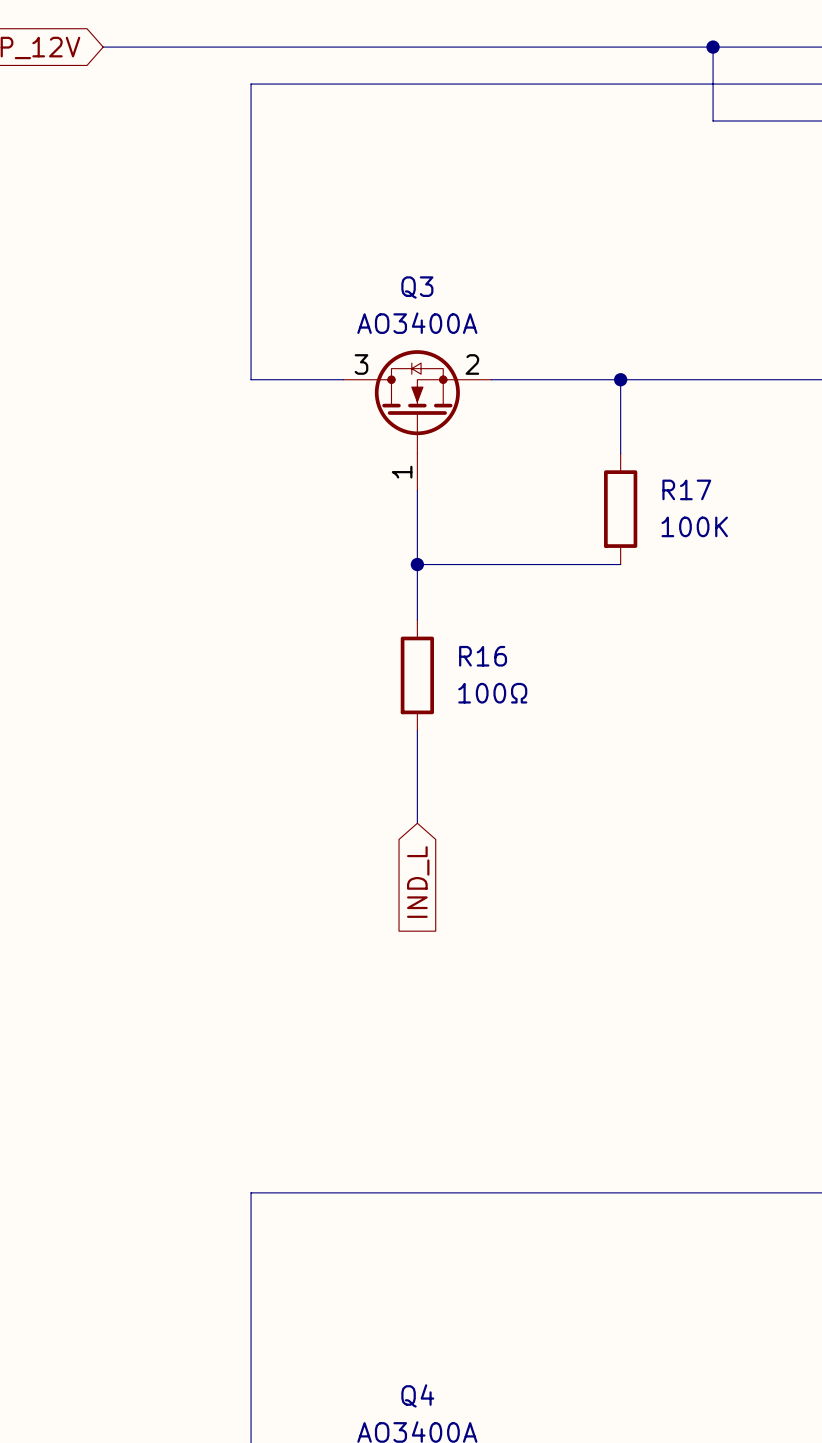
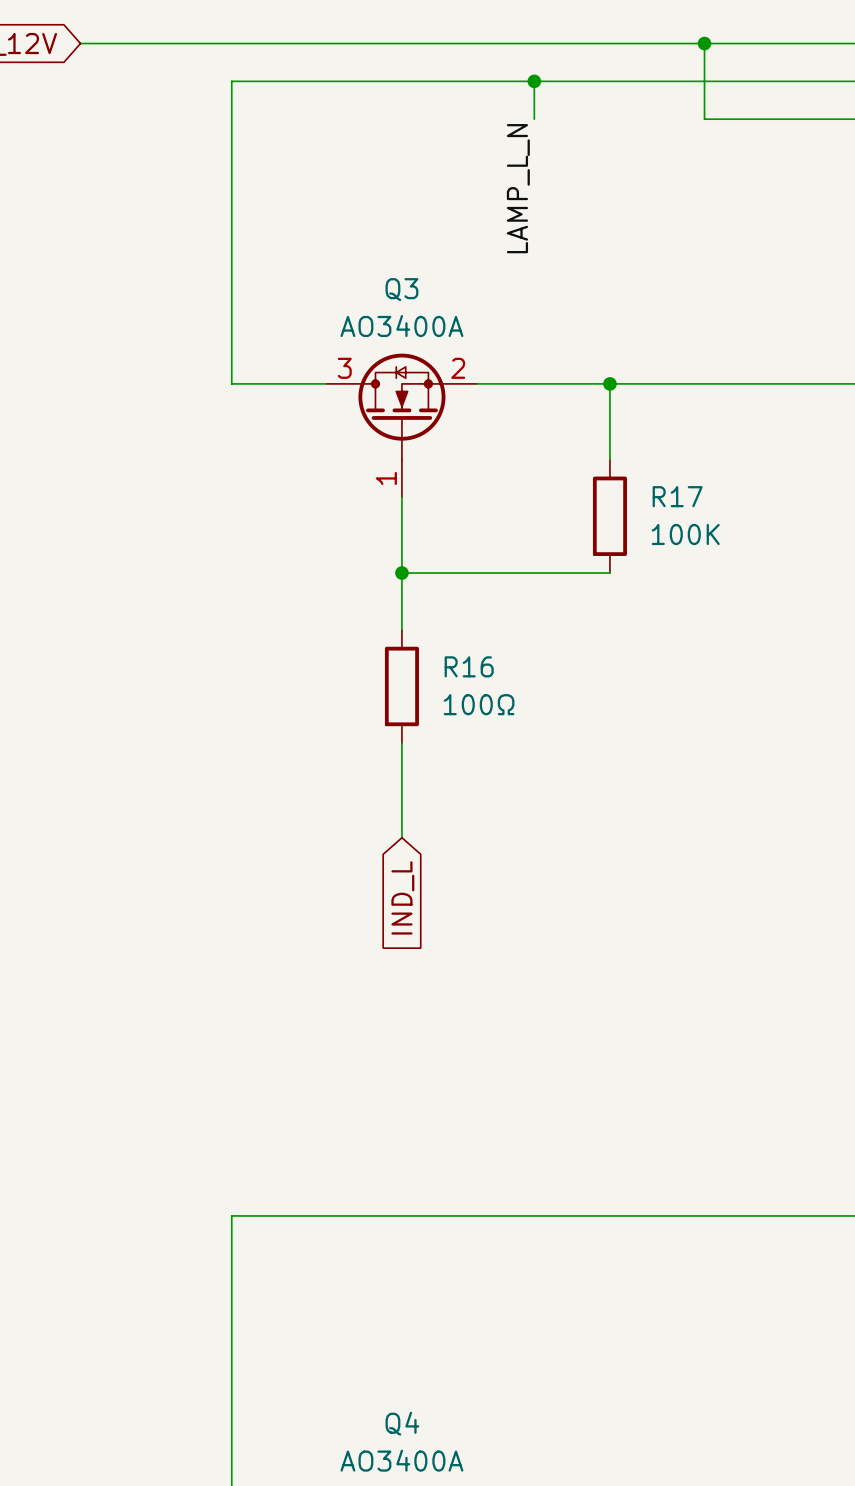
wire: none -> (534, 81) (534, 119)
junction: none -> (534, 81)
label: none -> LAMP_L_N (518, 188)

